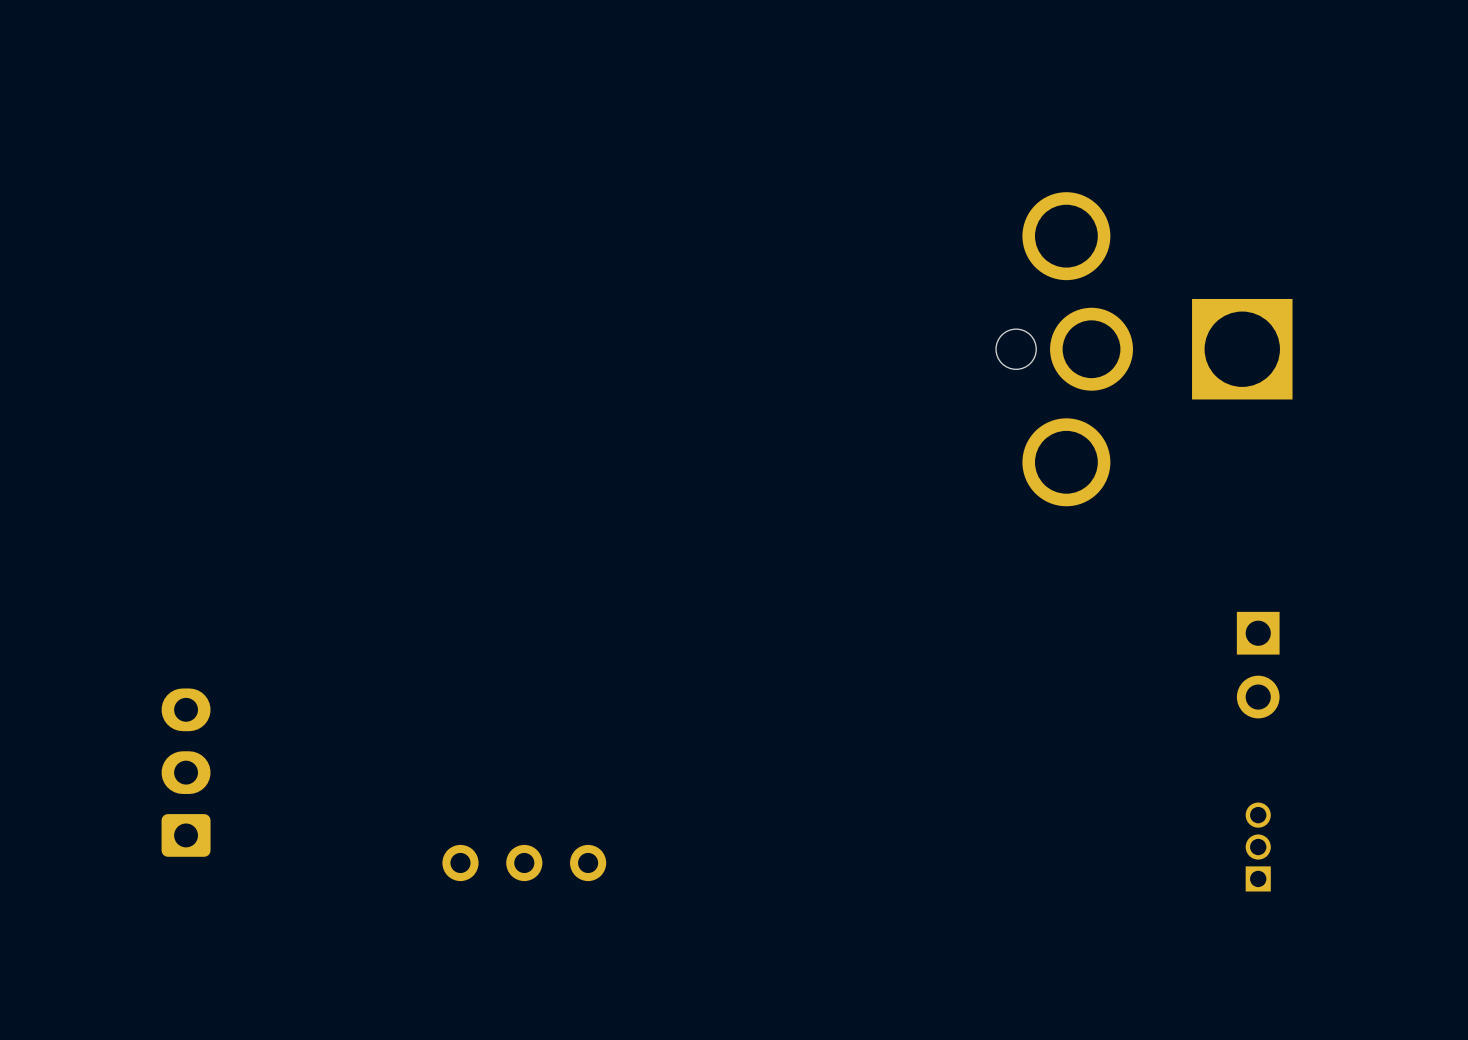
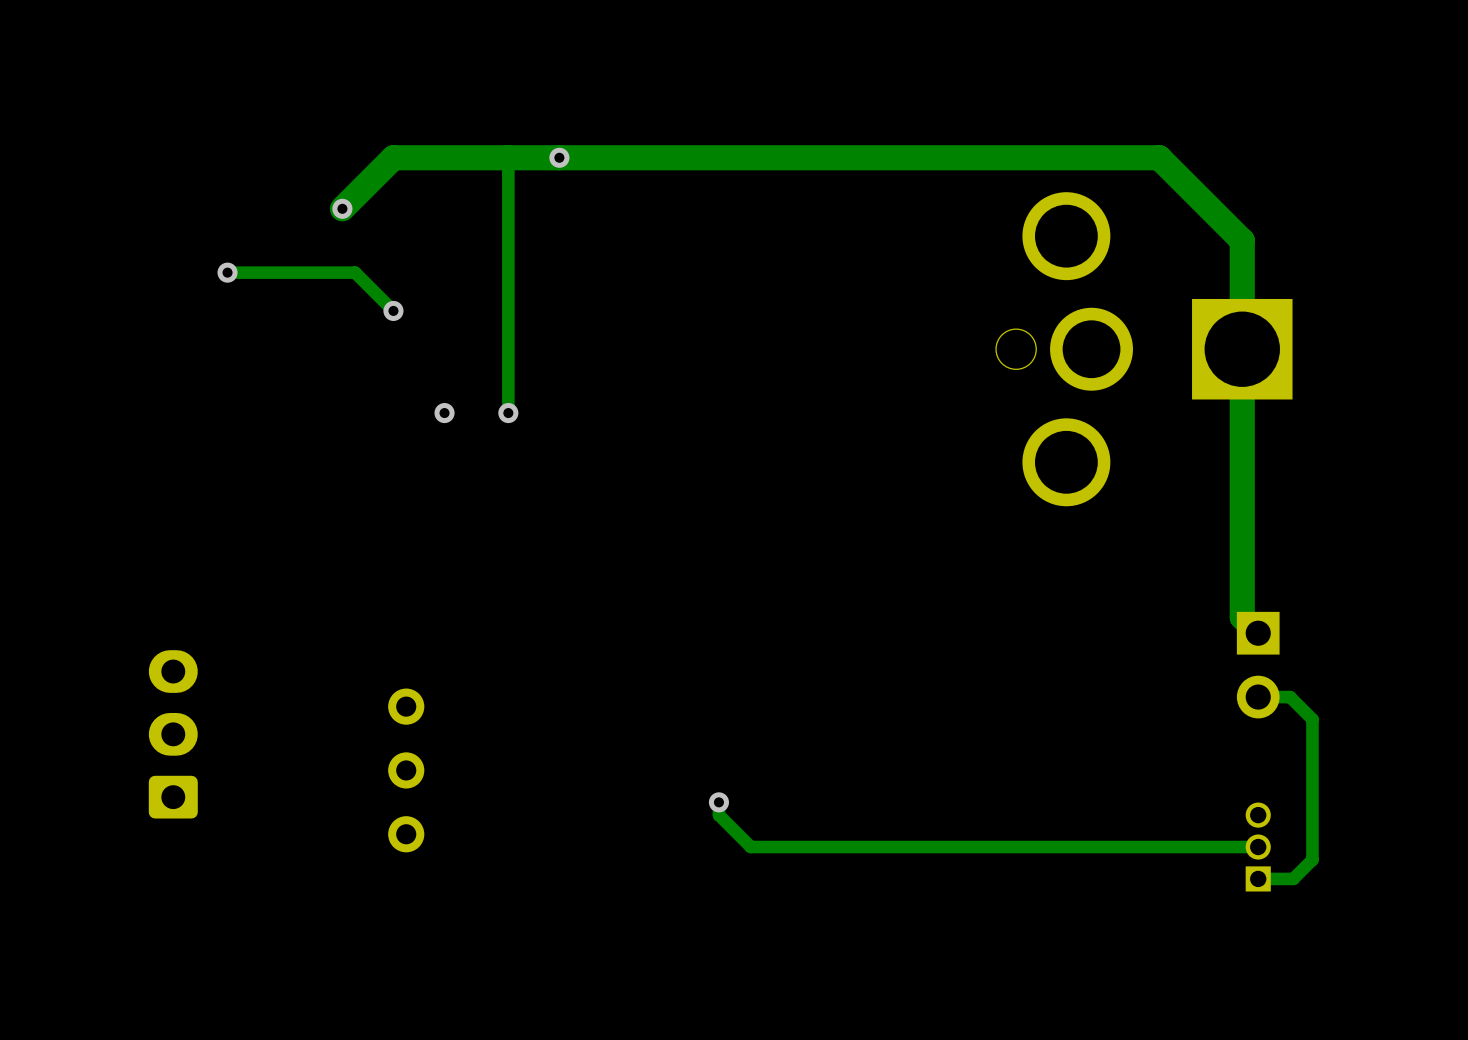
track: none -> (508, 157) (508, 413)
via: none -> (559, 157)
track: none -> (342, 208) (393, 157) (1159, 157) (1242, 240) (1242, 617) (1258, 633)
via: none -> (342, 208)
track: none -> (227, 272) (355, 272) (393, 310)
via: none -> (227, 272)
via: none -> (393, 310)
via: none -> (444, 413)
via: none -> (508, 413)
track: none -> (1258, 697) (1290, 697) (1312, 719) (1312, 859) (1293, 878) (1258, 878)
part position: (186, 772) -> (173, 734)
track: none -> (718, 802) (718, 815) (750, 847) (1258, 847)
via: none -> (718, 802)
part rotation: 0° (524, 862) -> 90° clockwise (406, 770)
part position: (524, 862) -> (406, 770)

